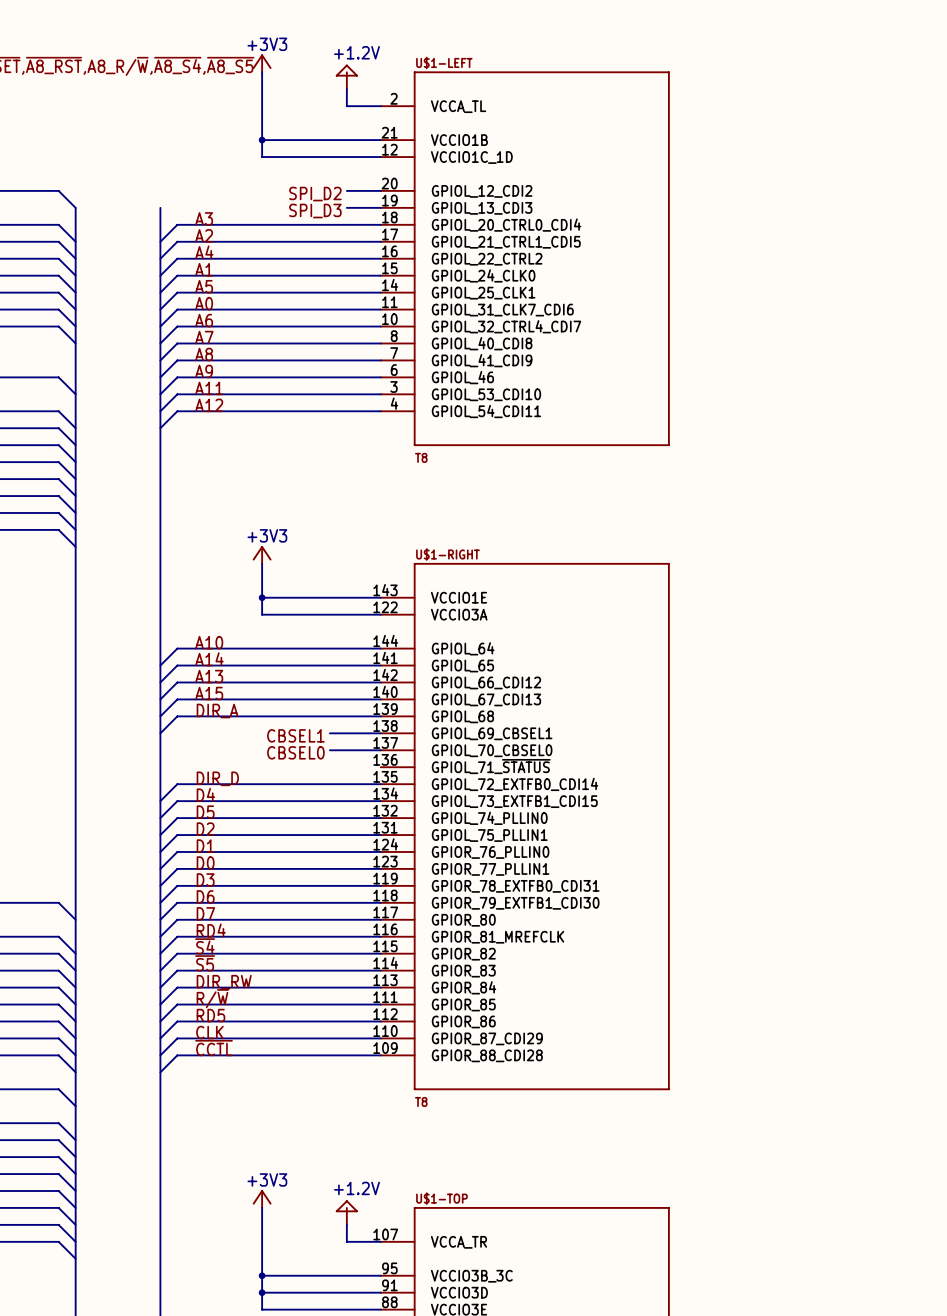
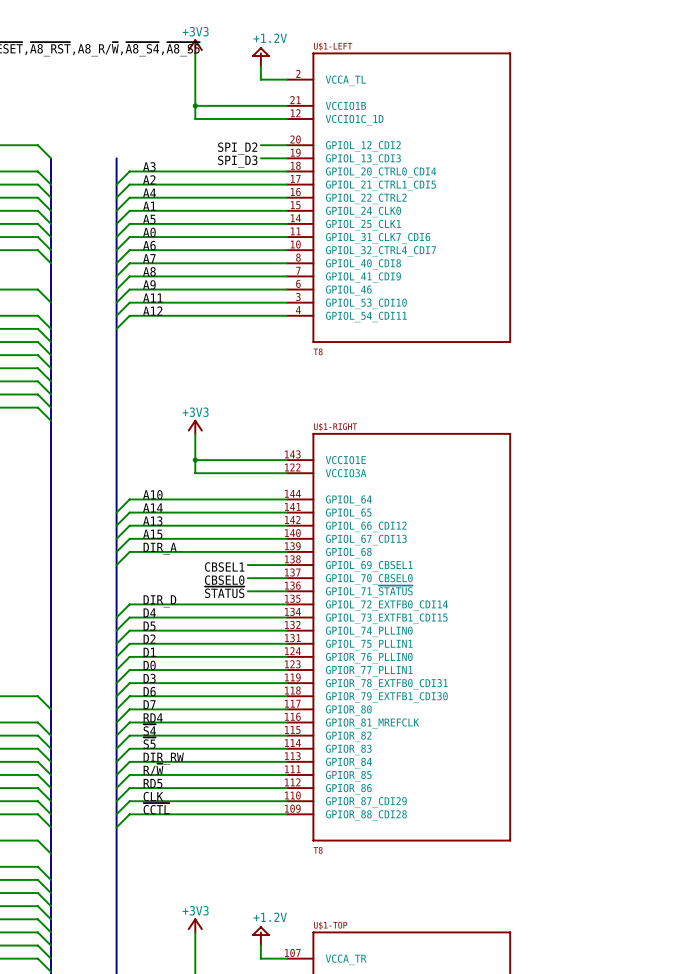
wire: none -> (247, 591) (287, 591)
label: none -> ~{STATUS} (224, 592)

